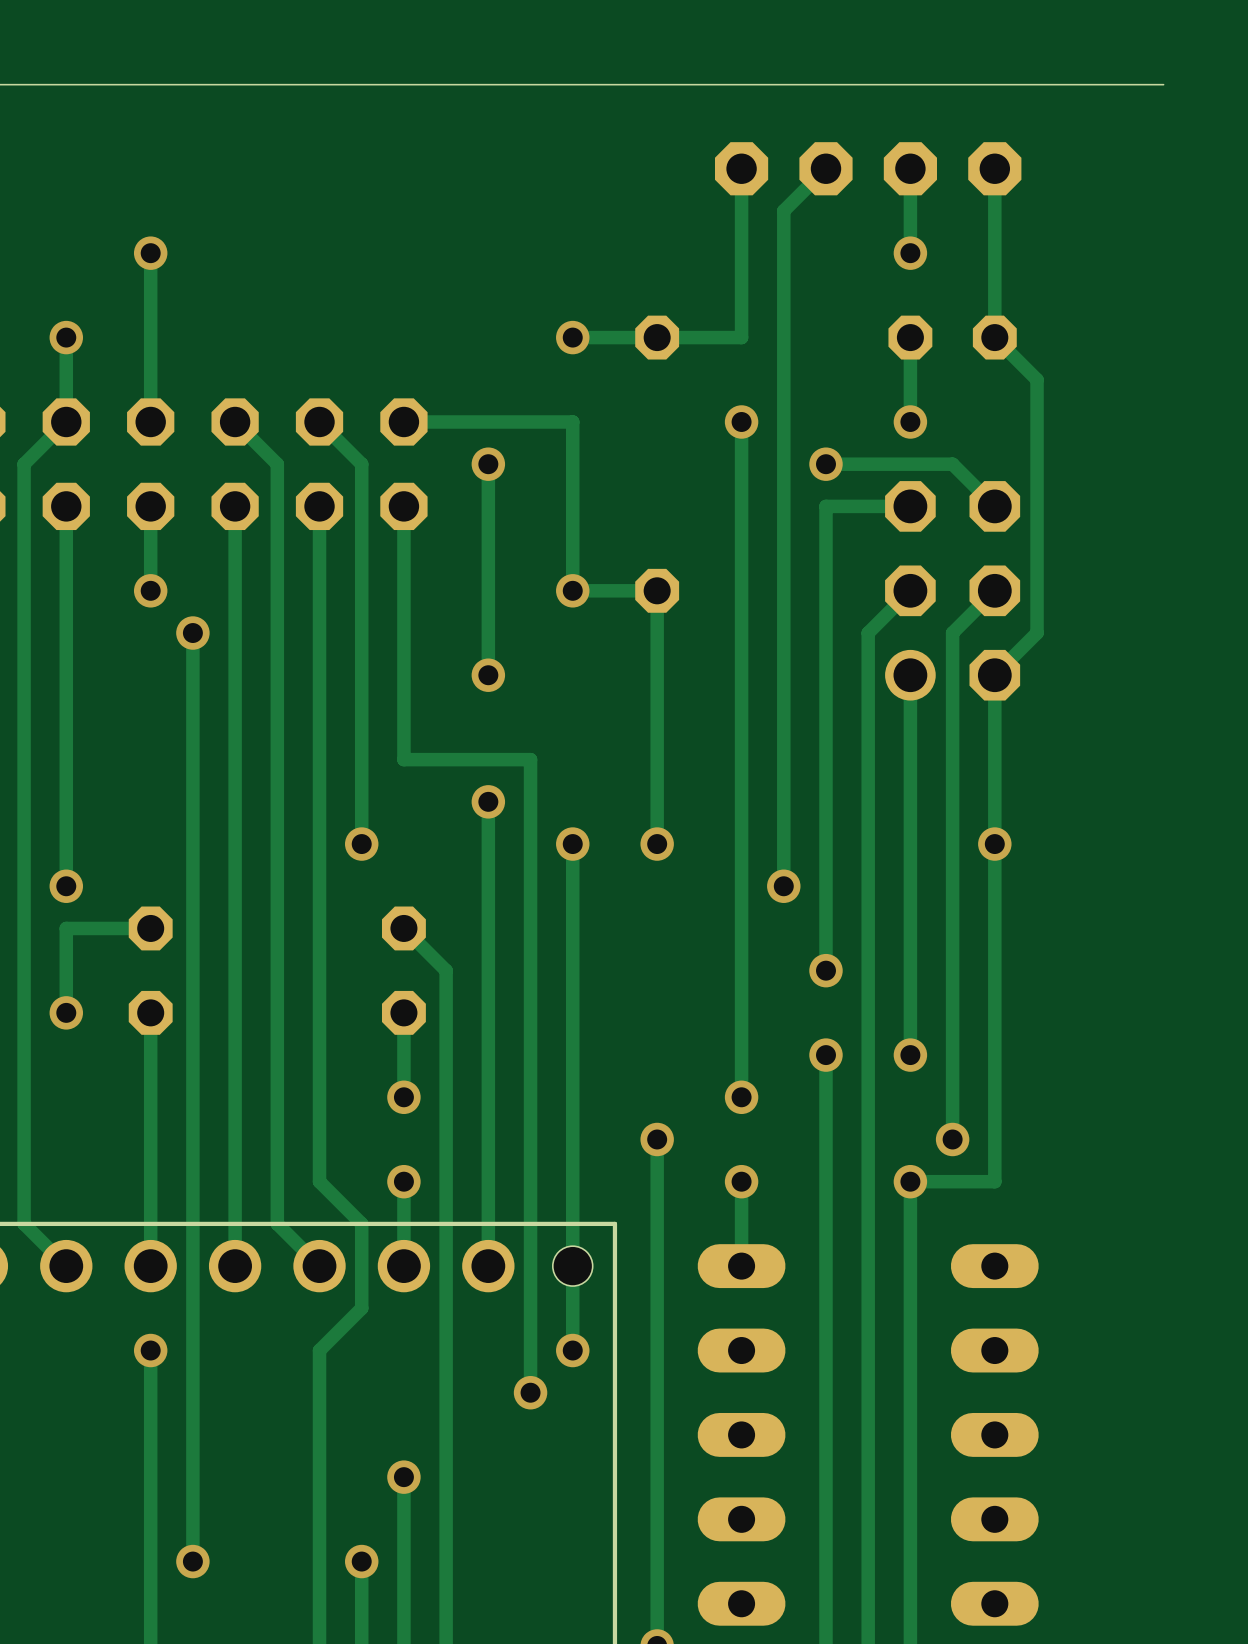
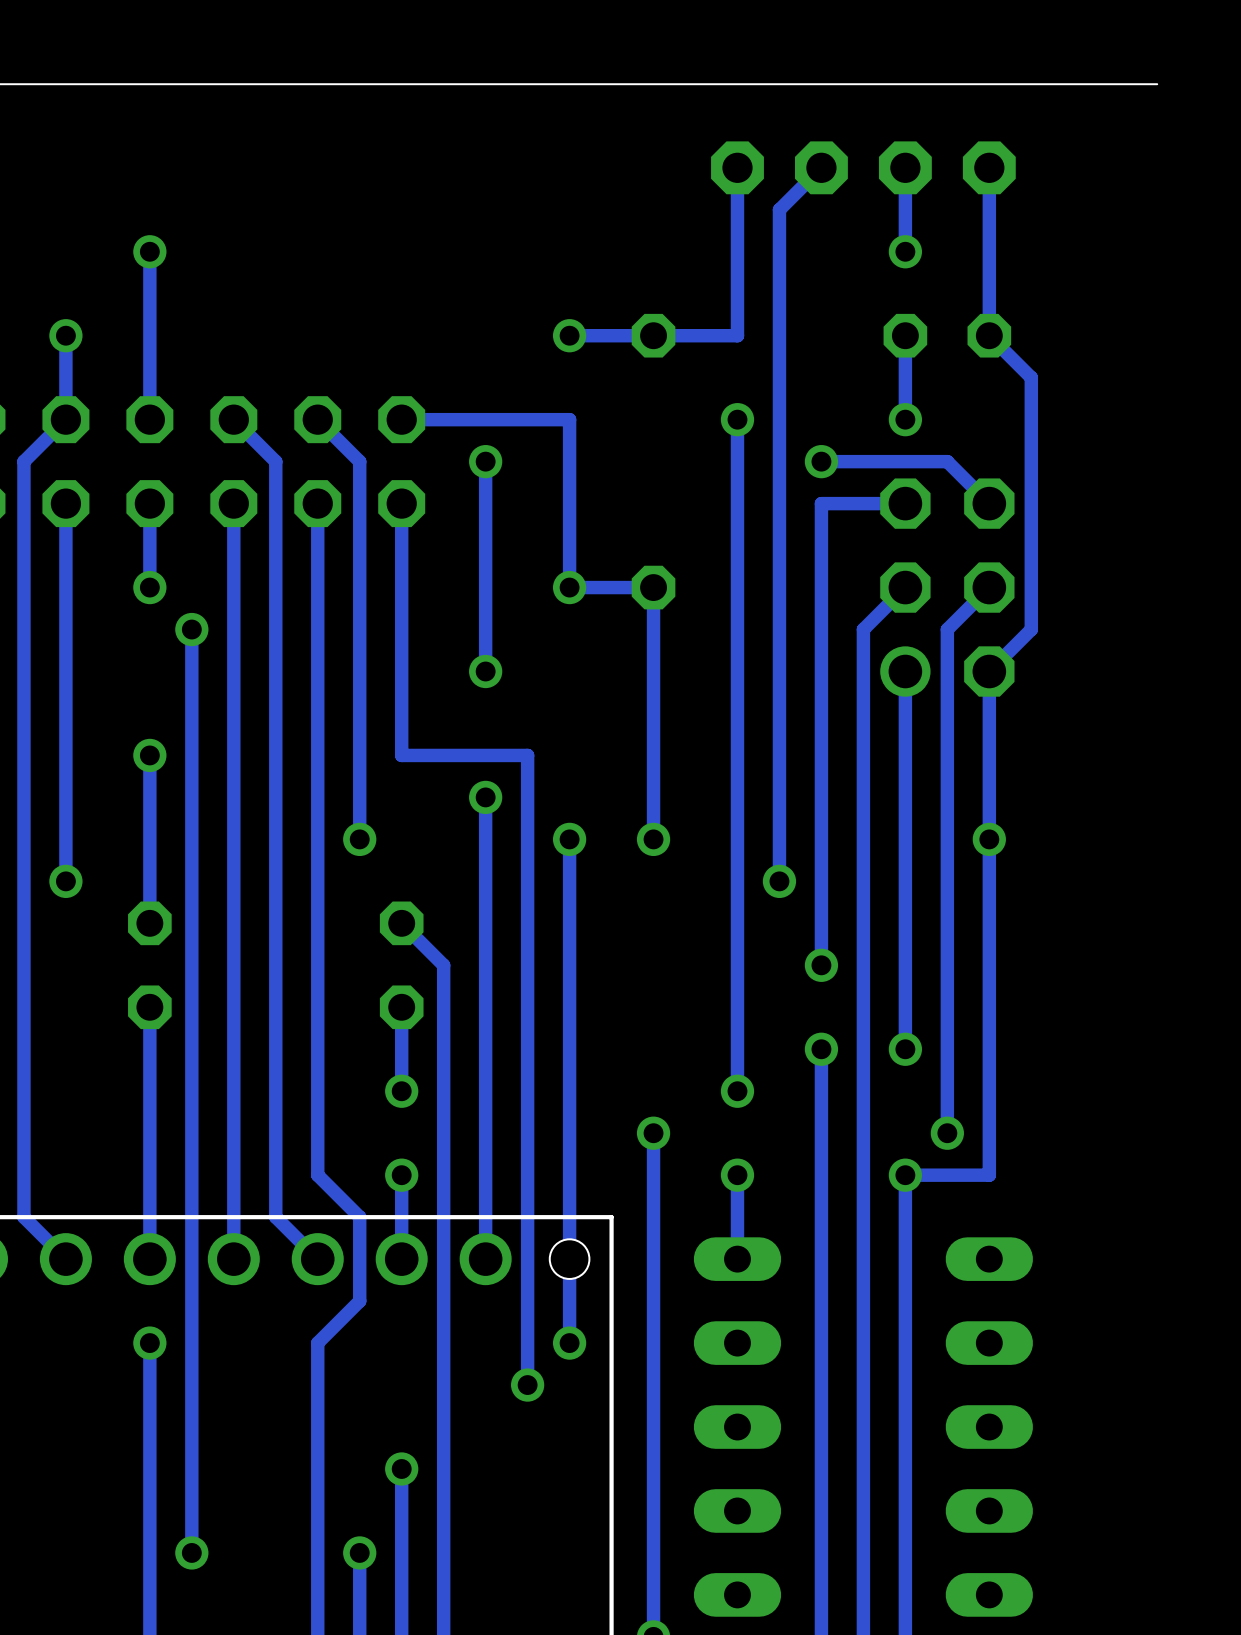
via: none -> (149, 755)
track: (150, 928) (66, 928) (66, 1012) -> (149, 923) (149, 755)
via: (66, 1012) -> none

